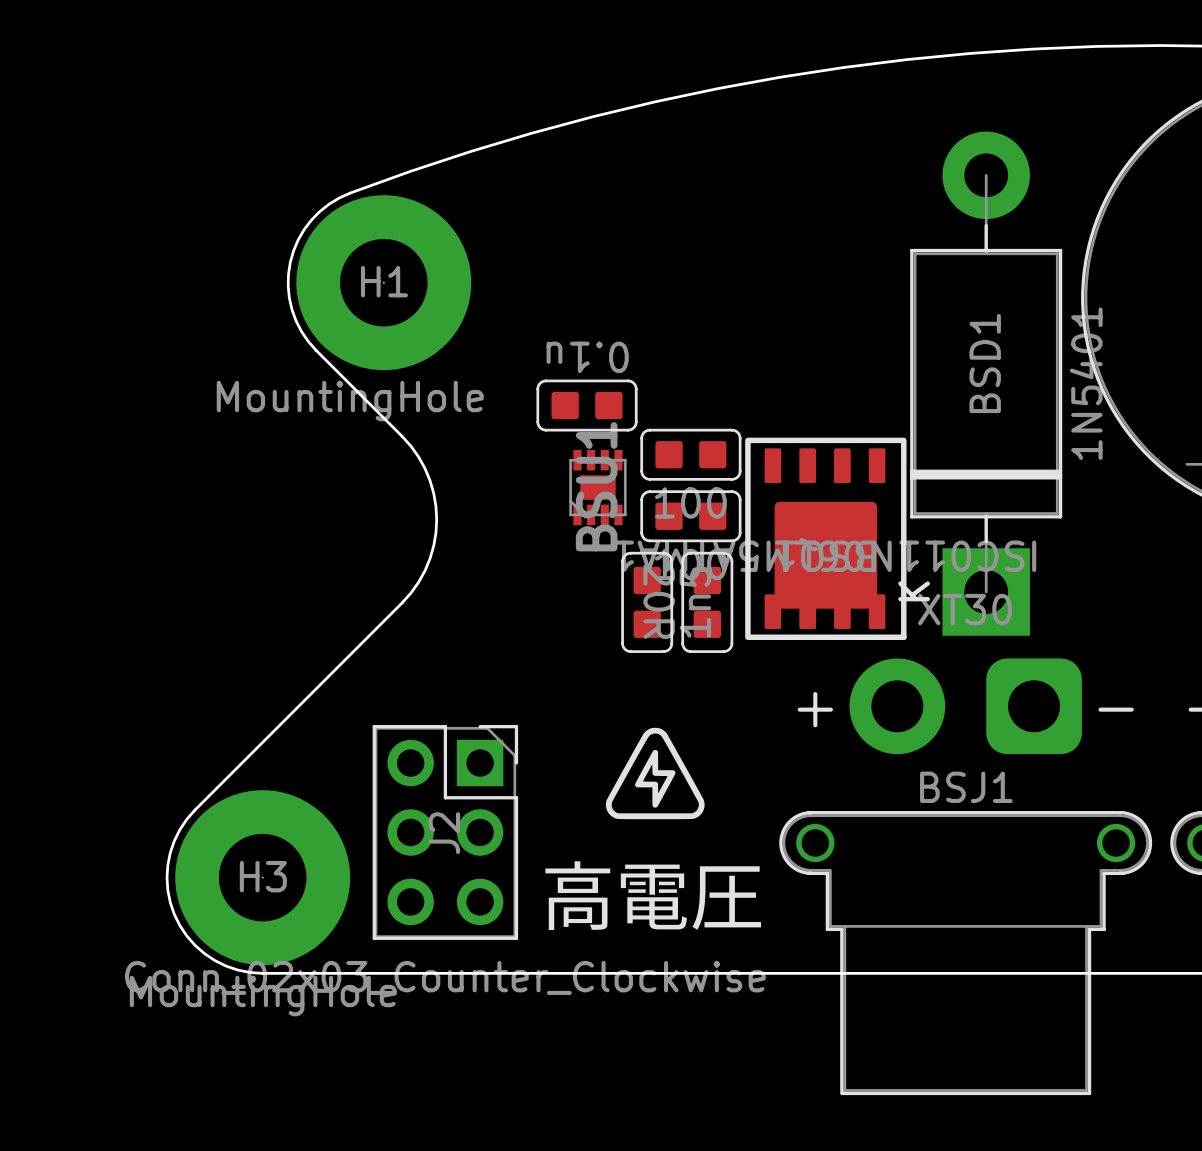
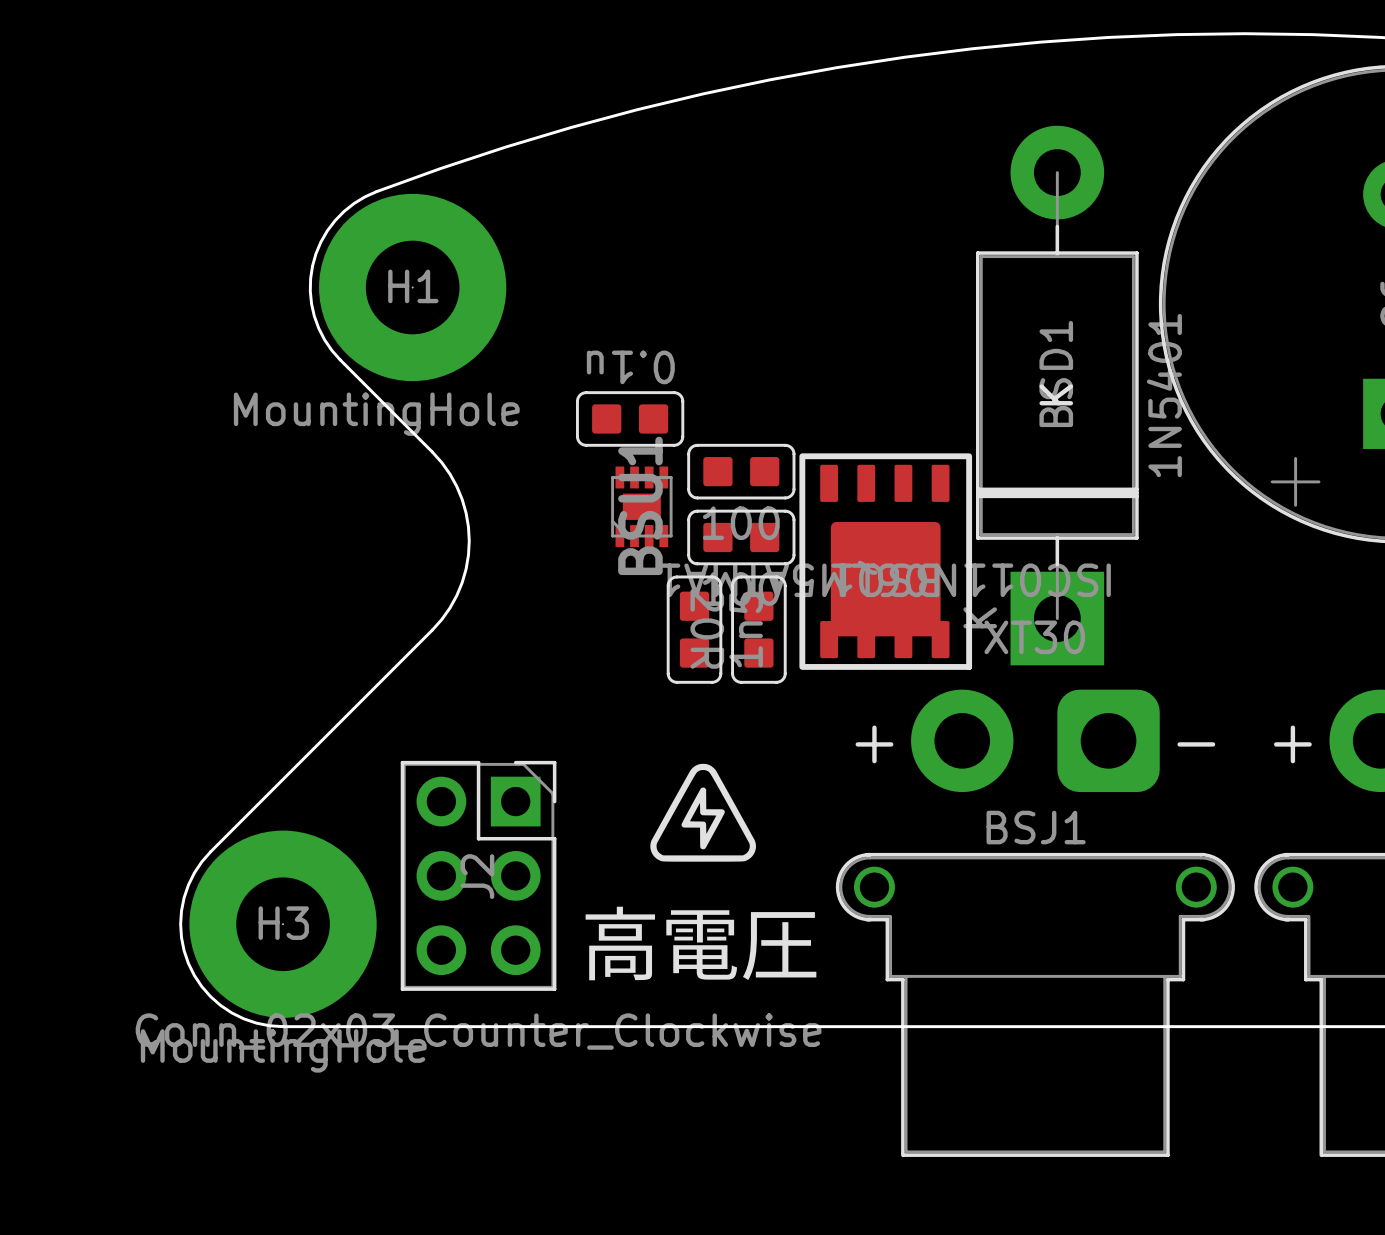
BSD1 footprint: [910, 131, 1063, 636] -> [976, 125, 1139, 666]

